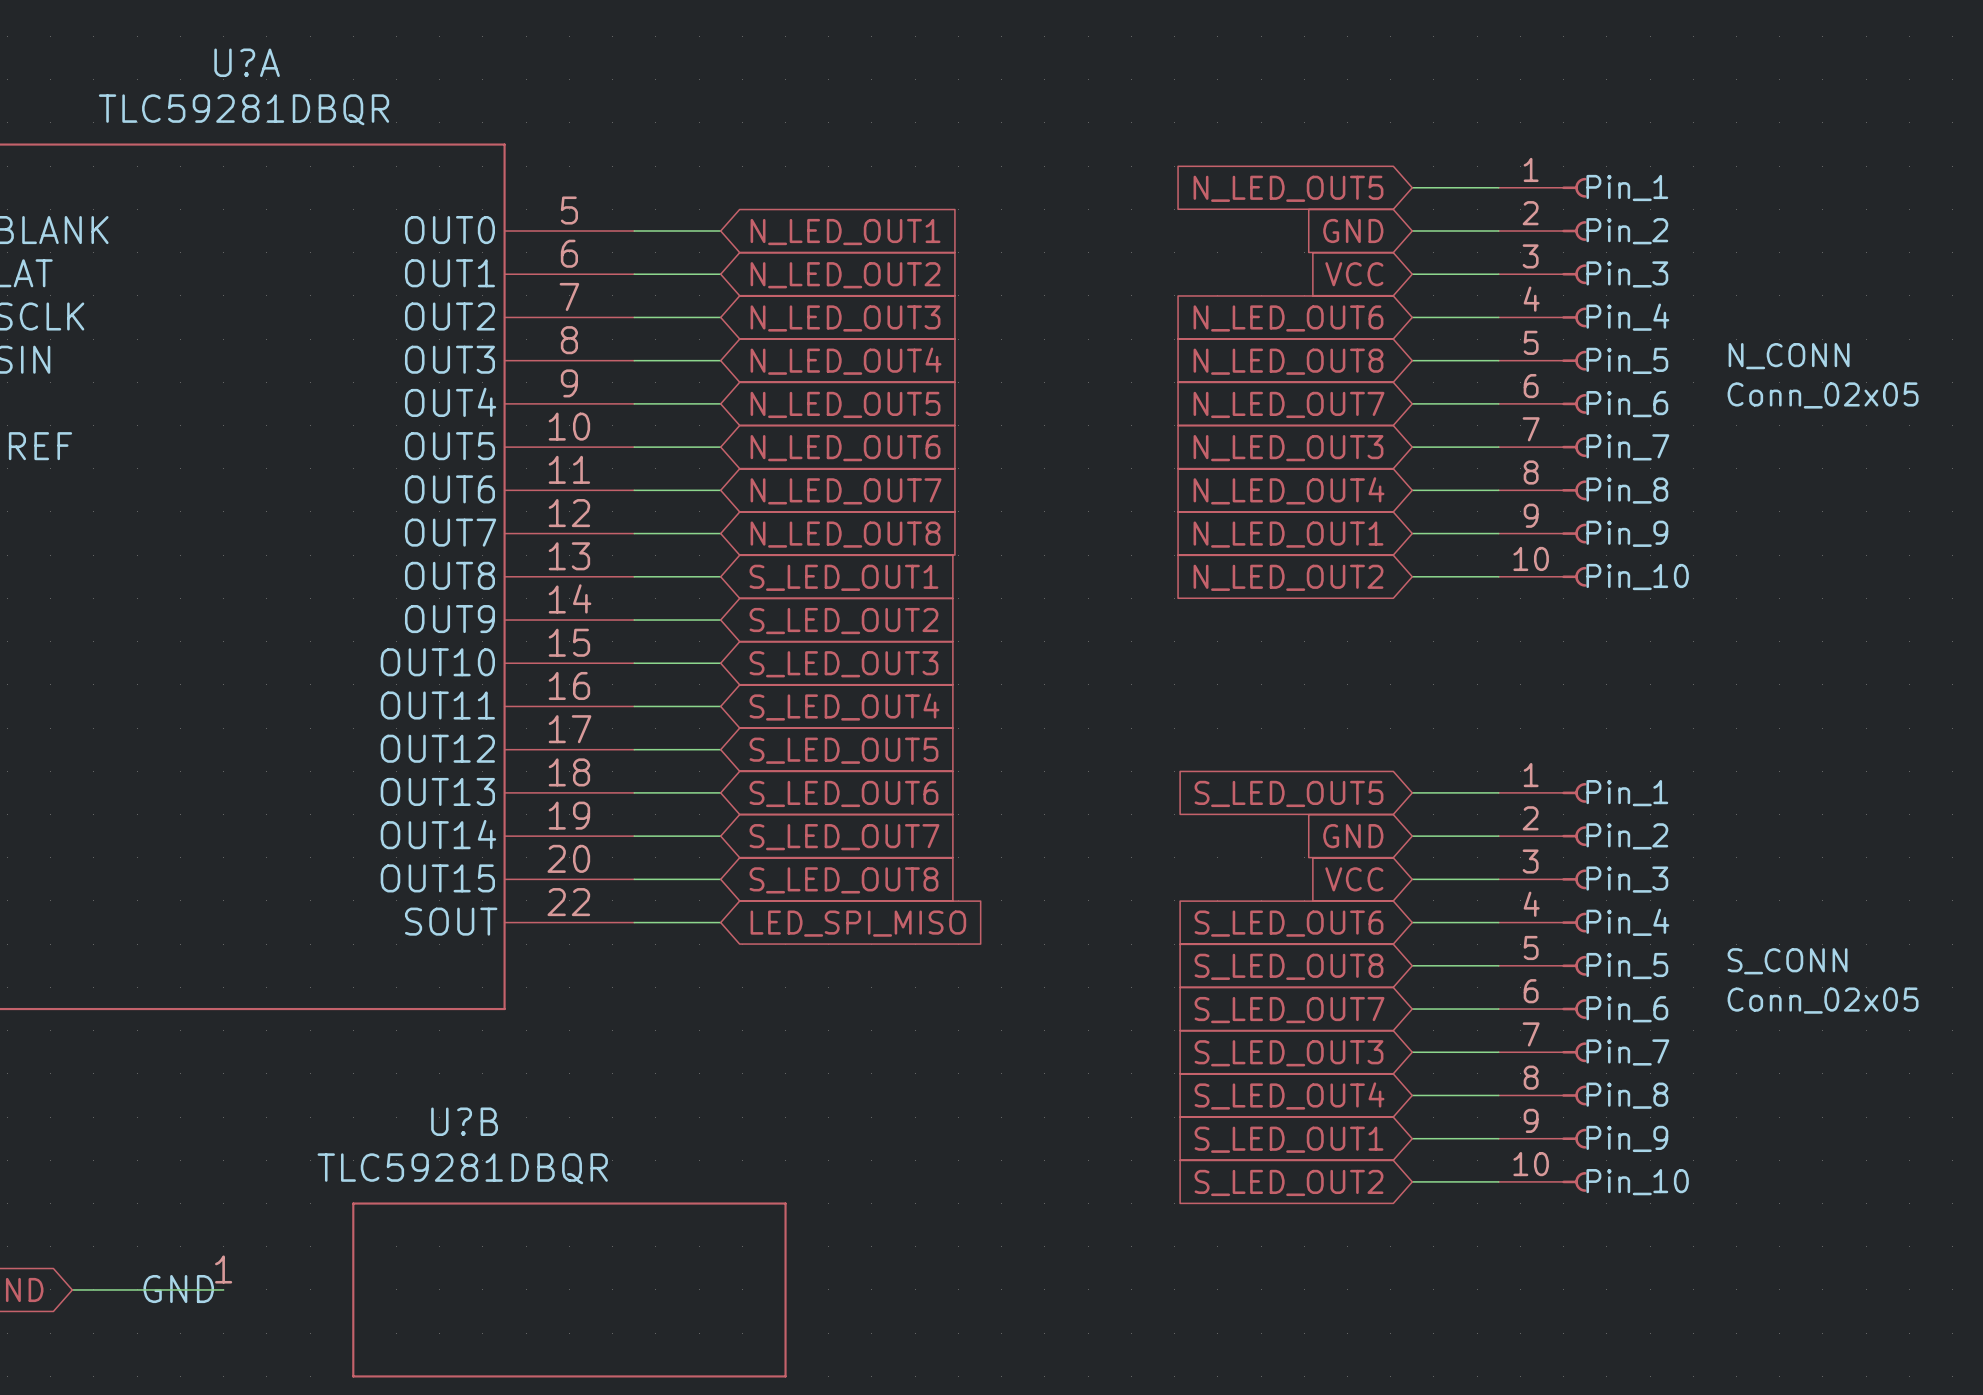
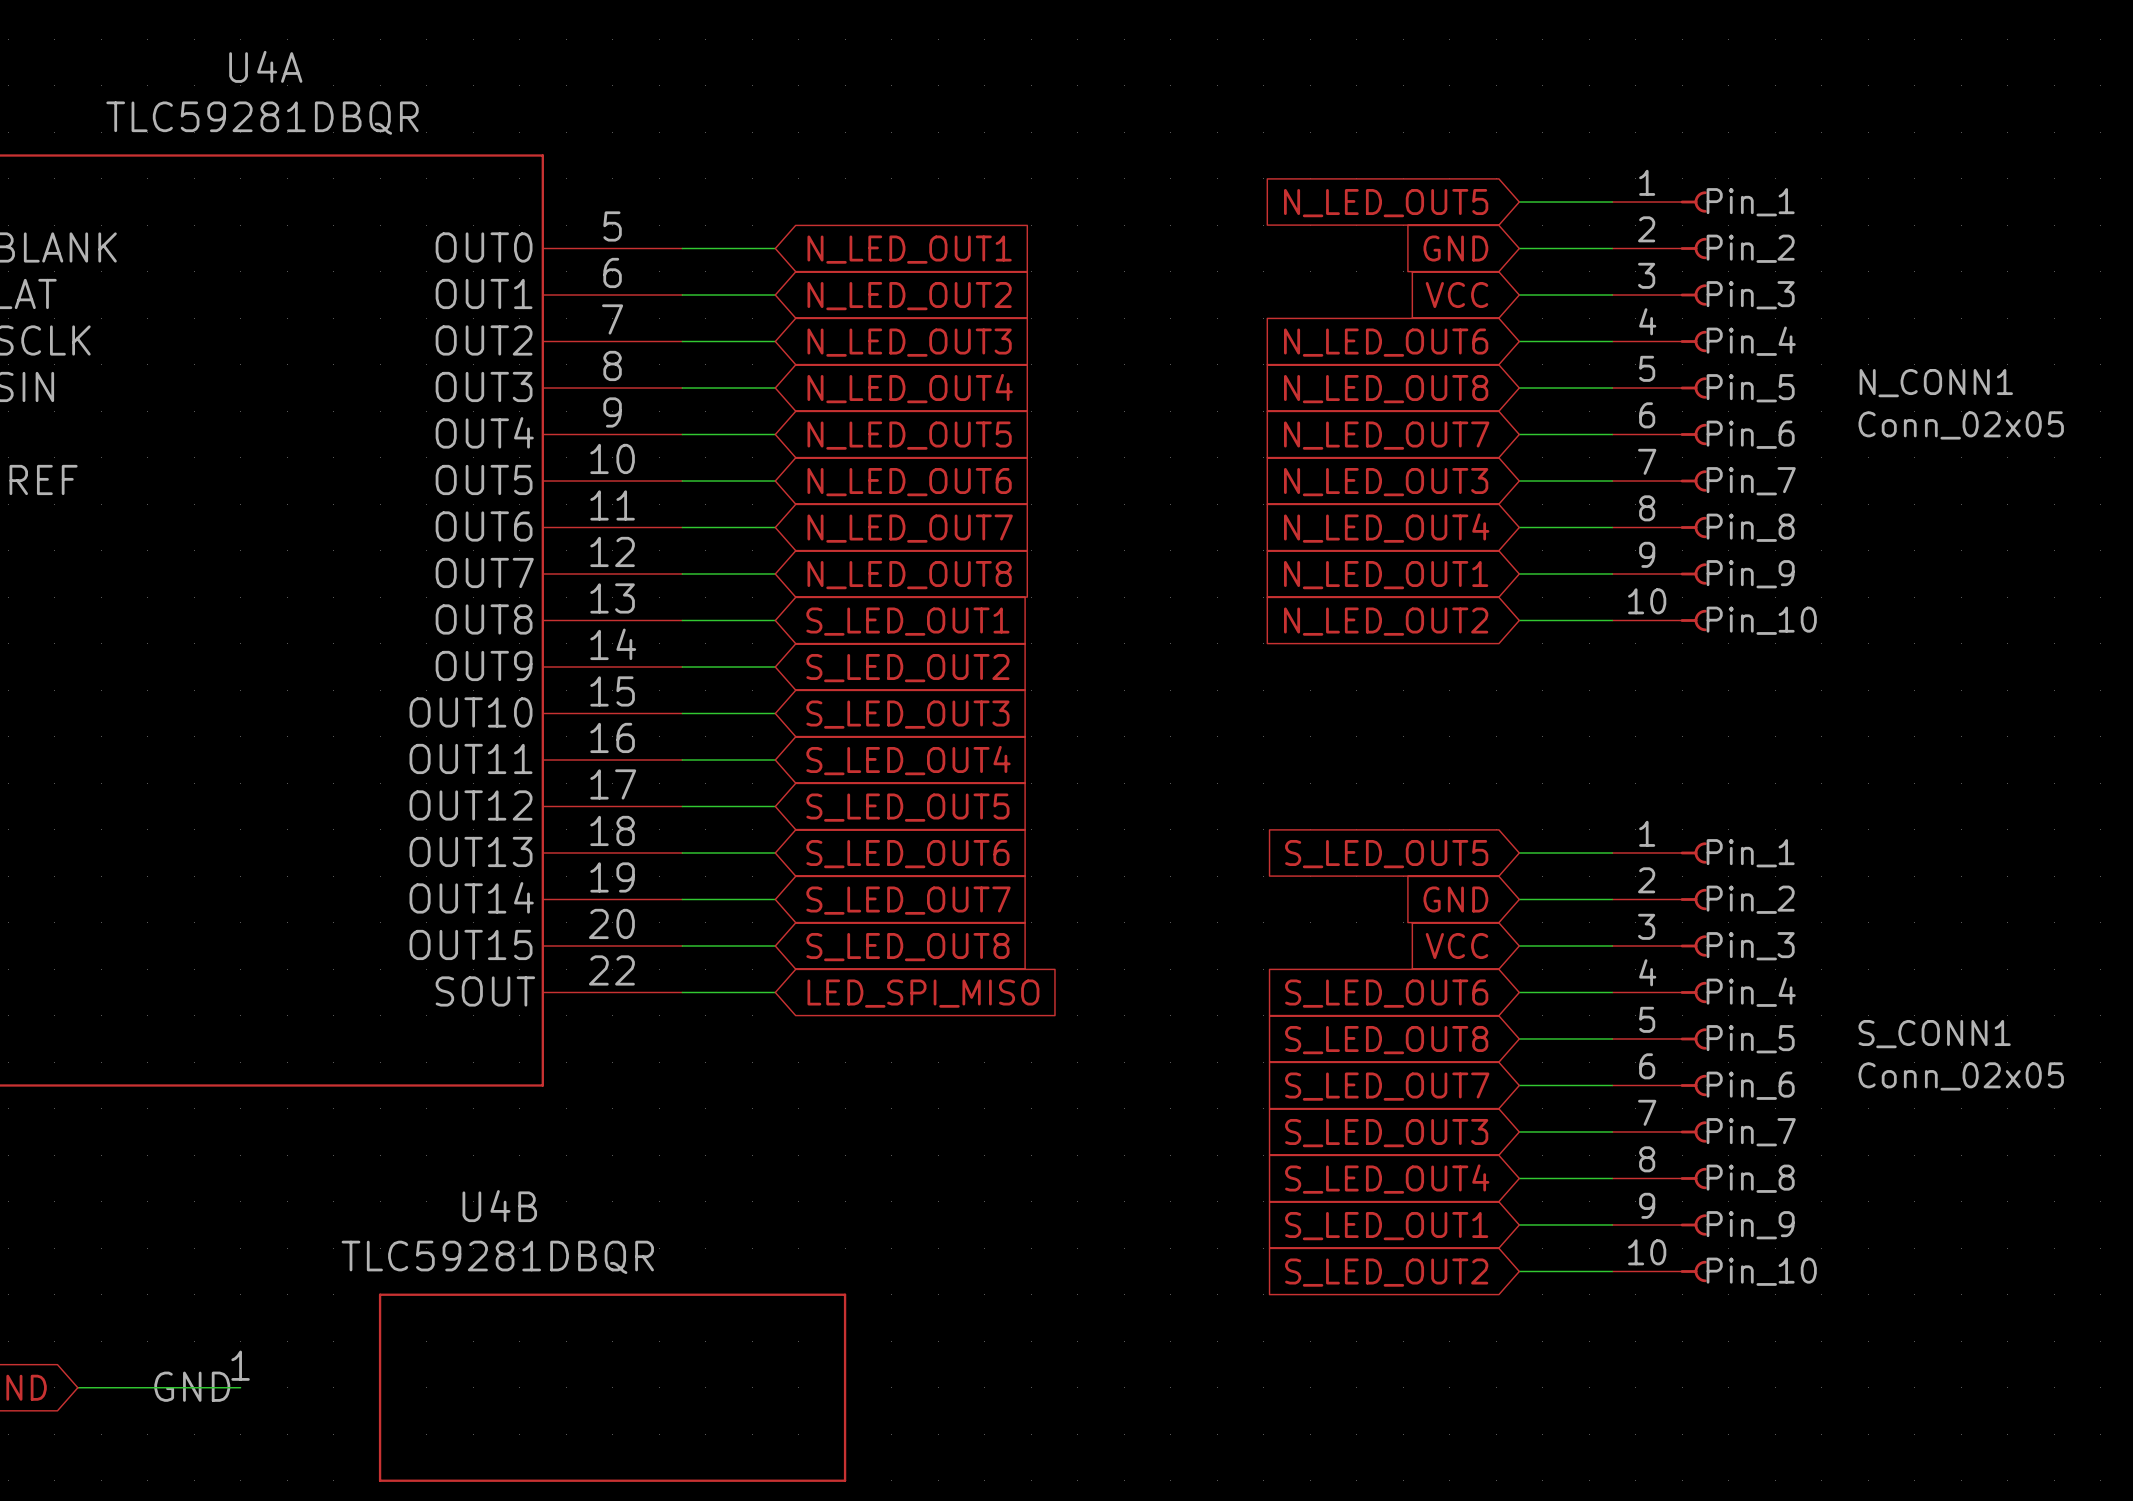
U?A name: U?A (247, 62) -> U4A (265, 66)
N_CONN name: N_CONN (1789, 356) -> N_CONN1 (1936, 383)
S_CONN name: S_CONN (1787, 961) -> S_CONN1 (1934, 1034)
U?B name: U?B (464, 1121) -> U4B (499, 1206)

